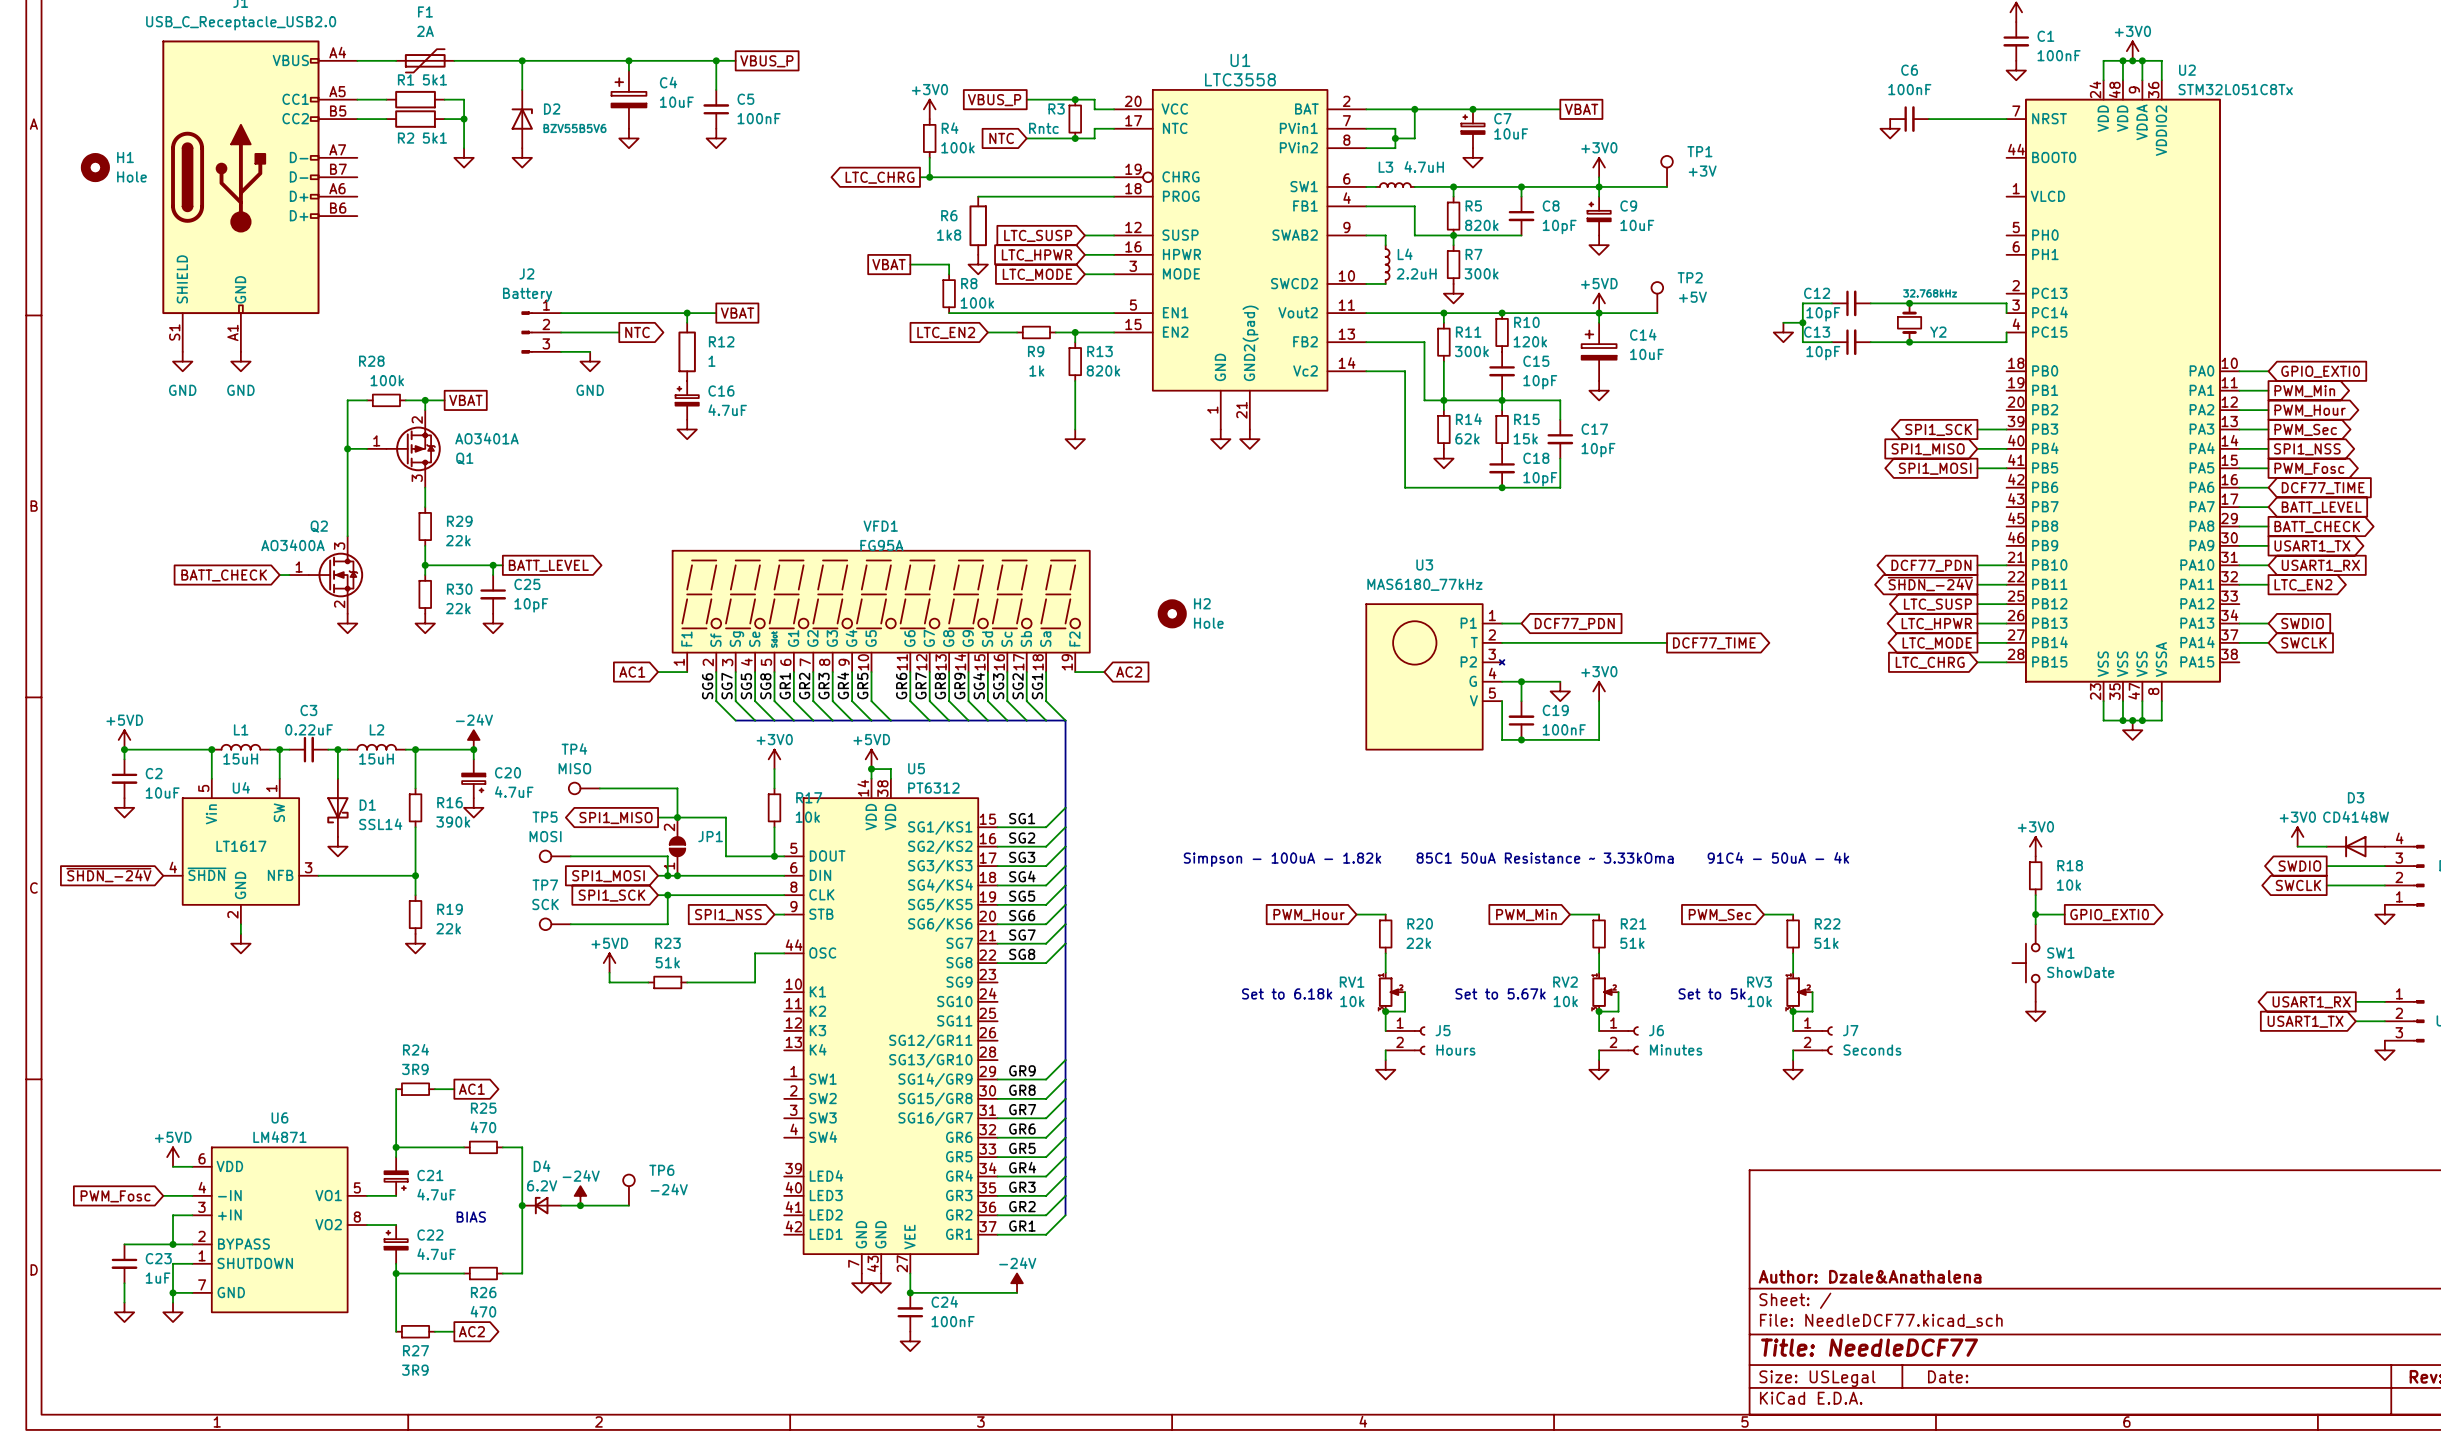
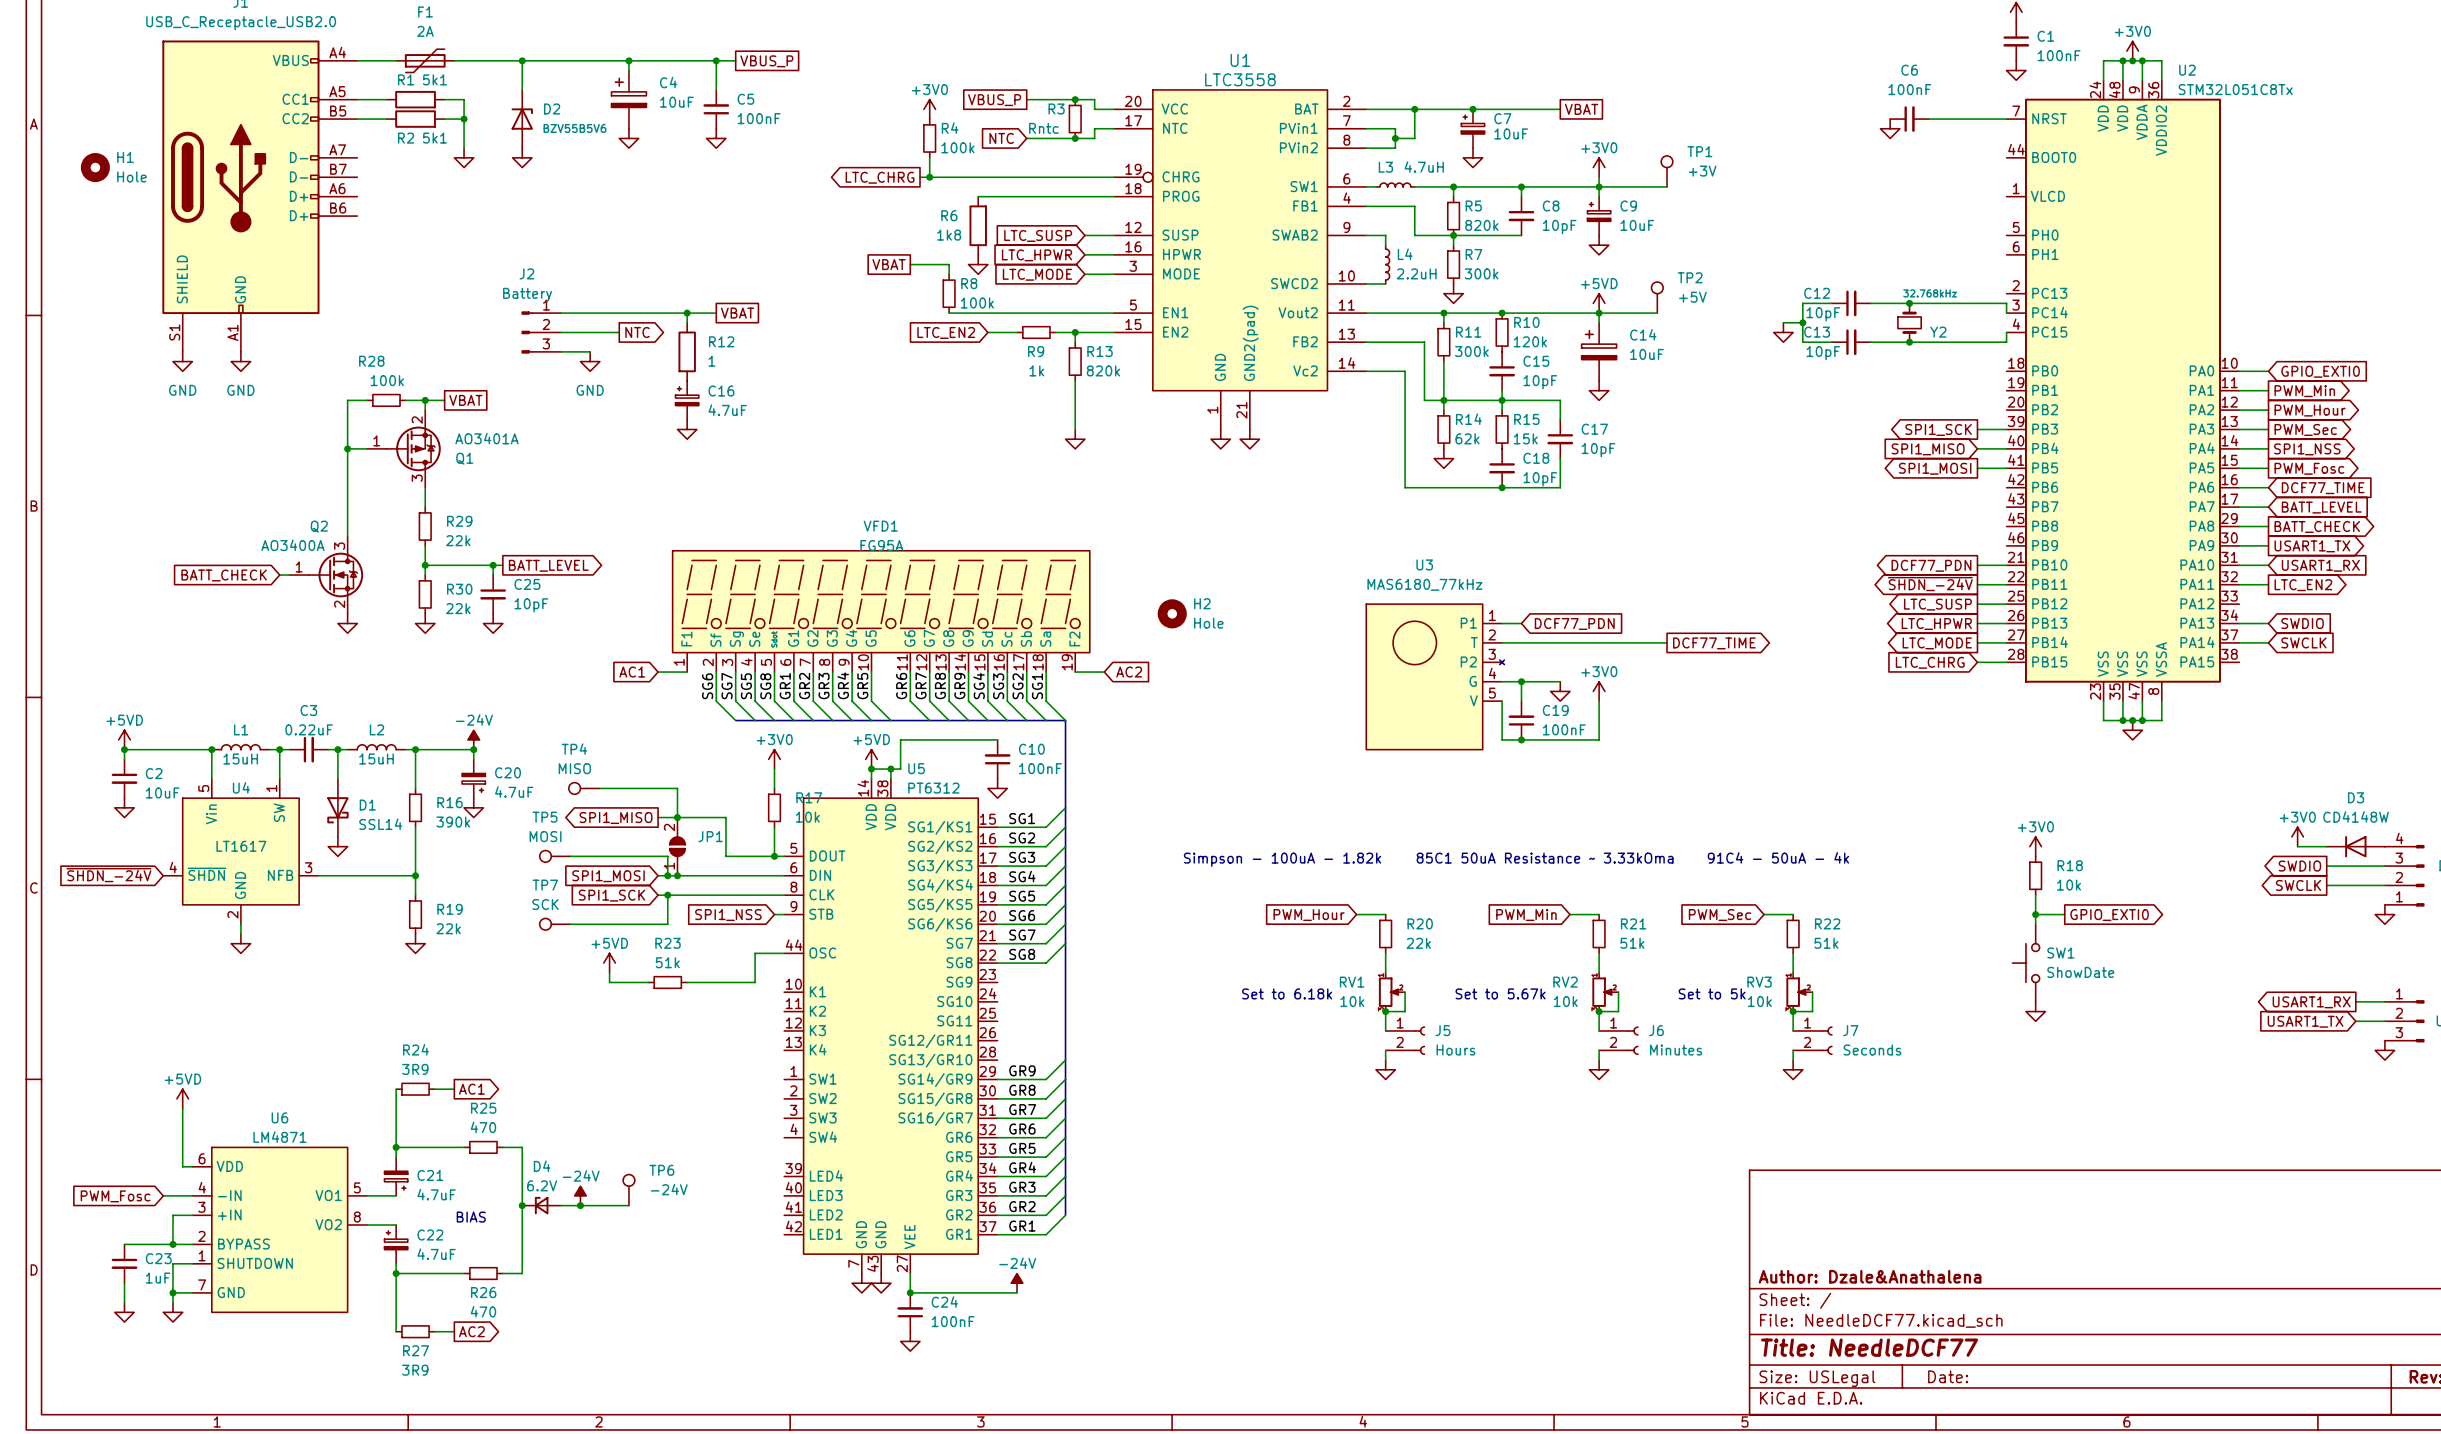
wire: none -> (997, 739) (900, 739) (900, 769) (890, 769)
C10: none -> 100nF (997, 759)
junction: none -> (890, 769)
power symbol: none -> (997, 788)
power symbol position: +5VD (173, 1157) -> +5VD (182, 1098)
wire: (173, 1166) (182, 1166) -> (182, 1108) (182, 1166)

